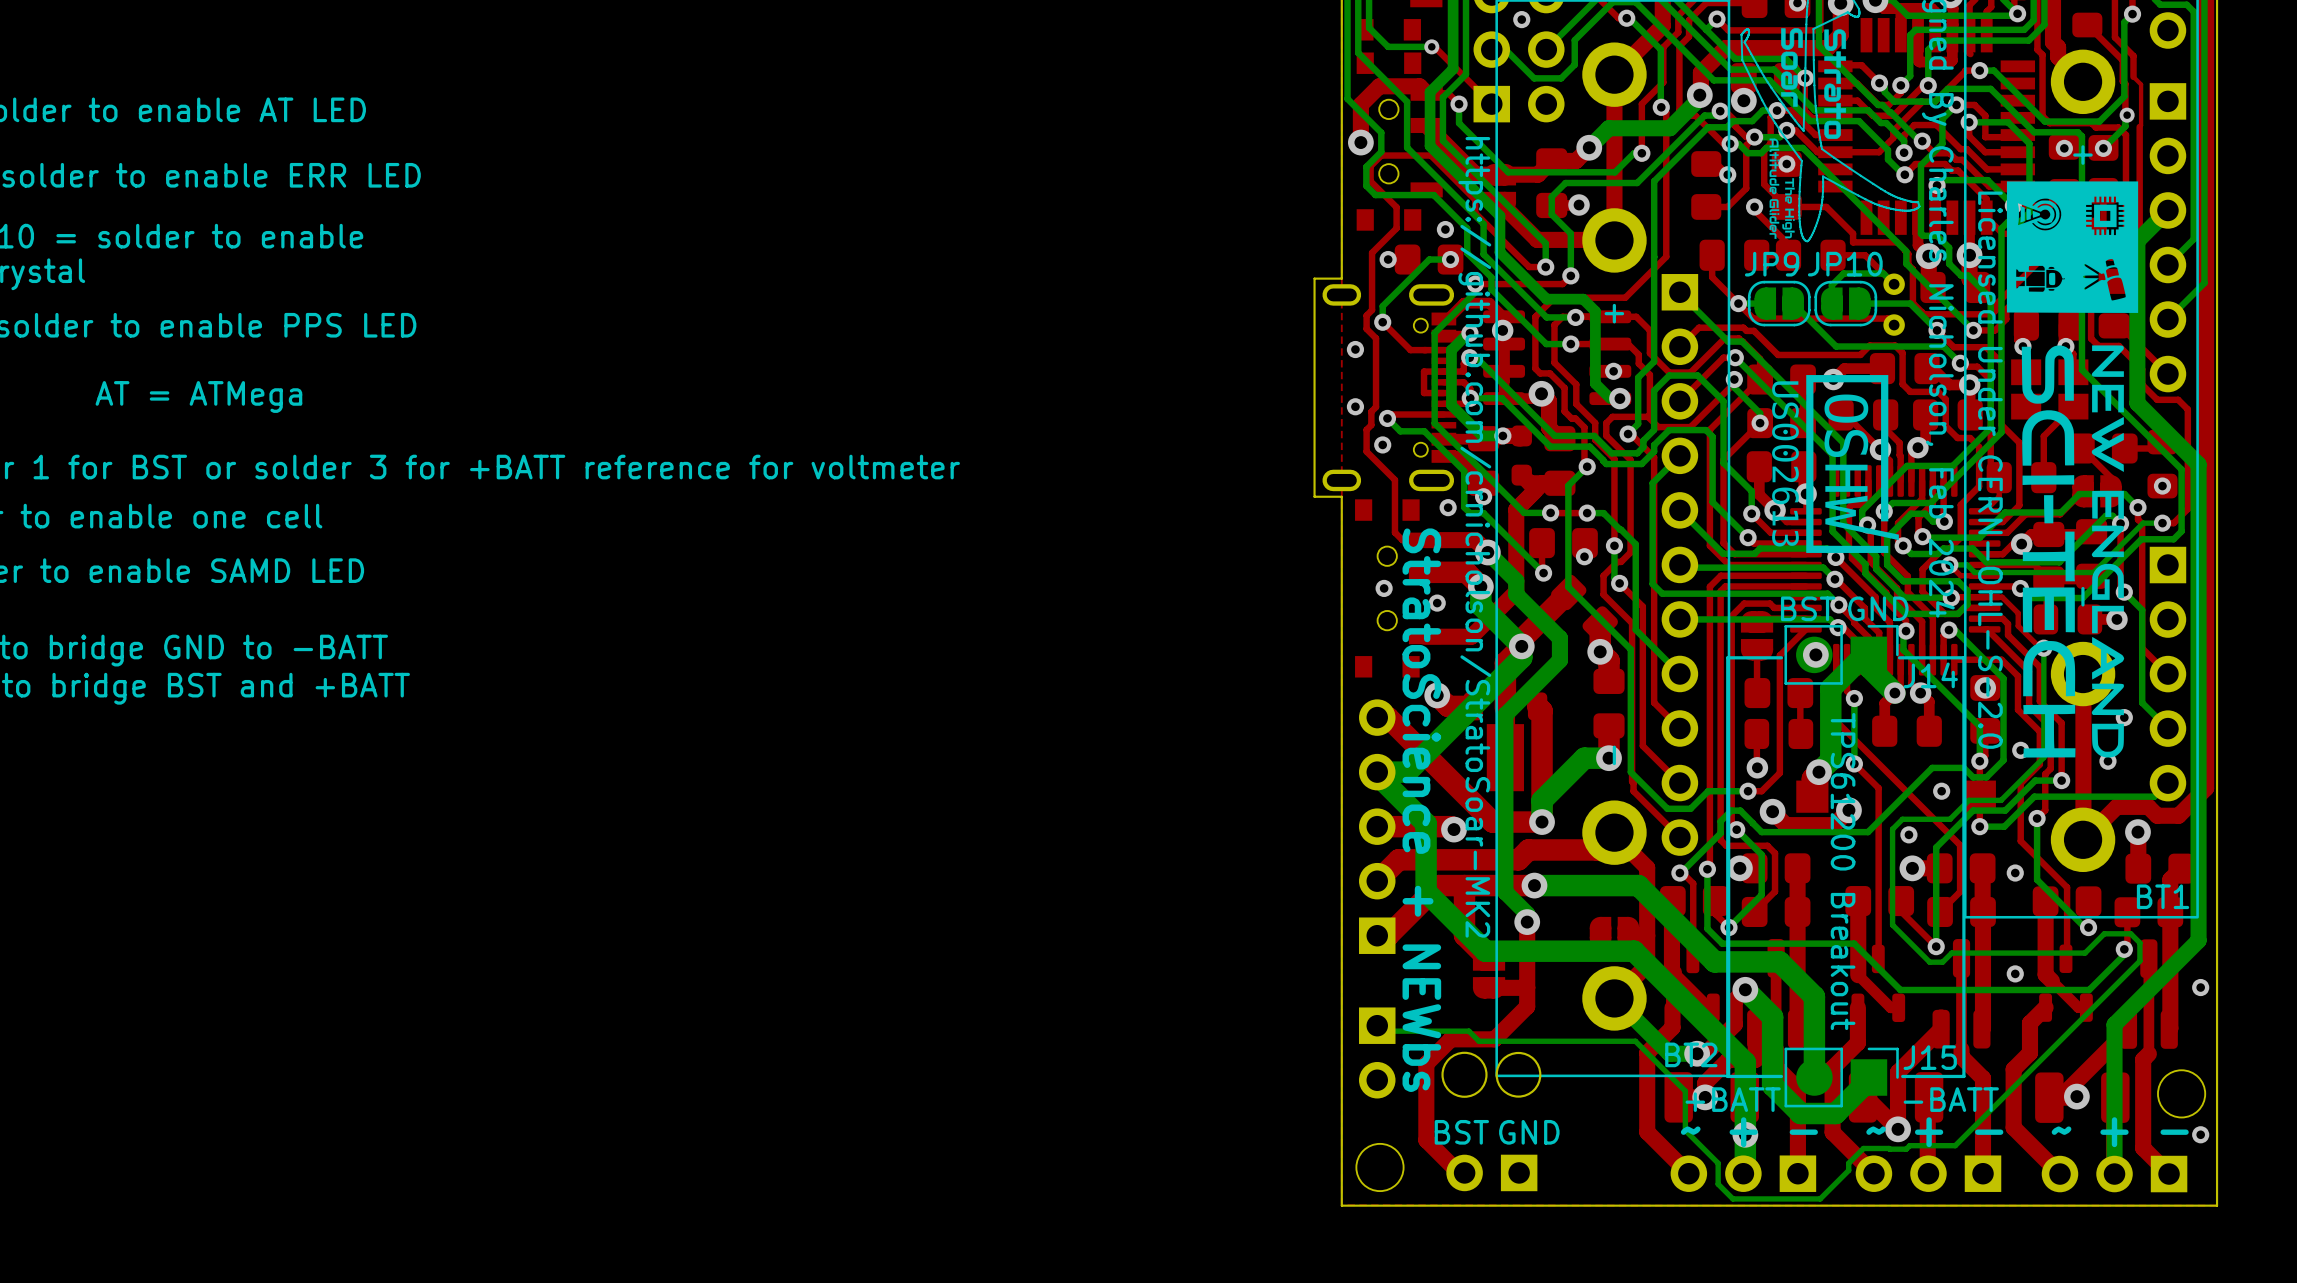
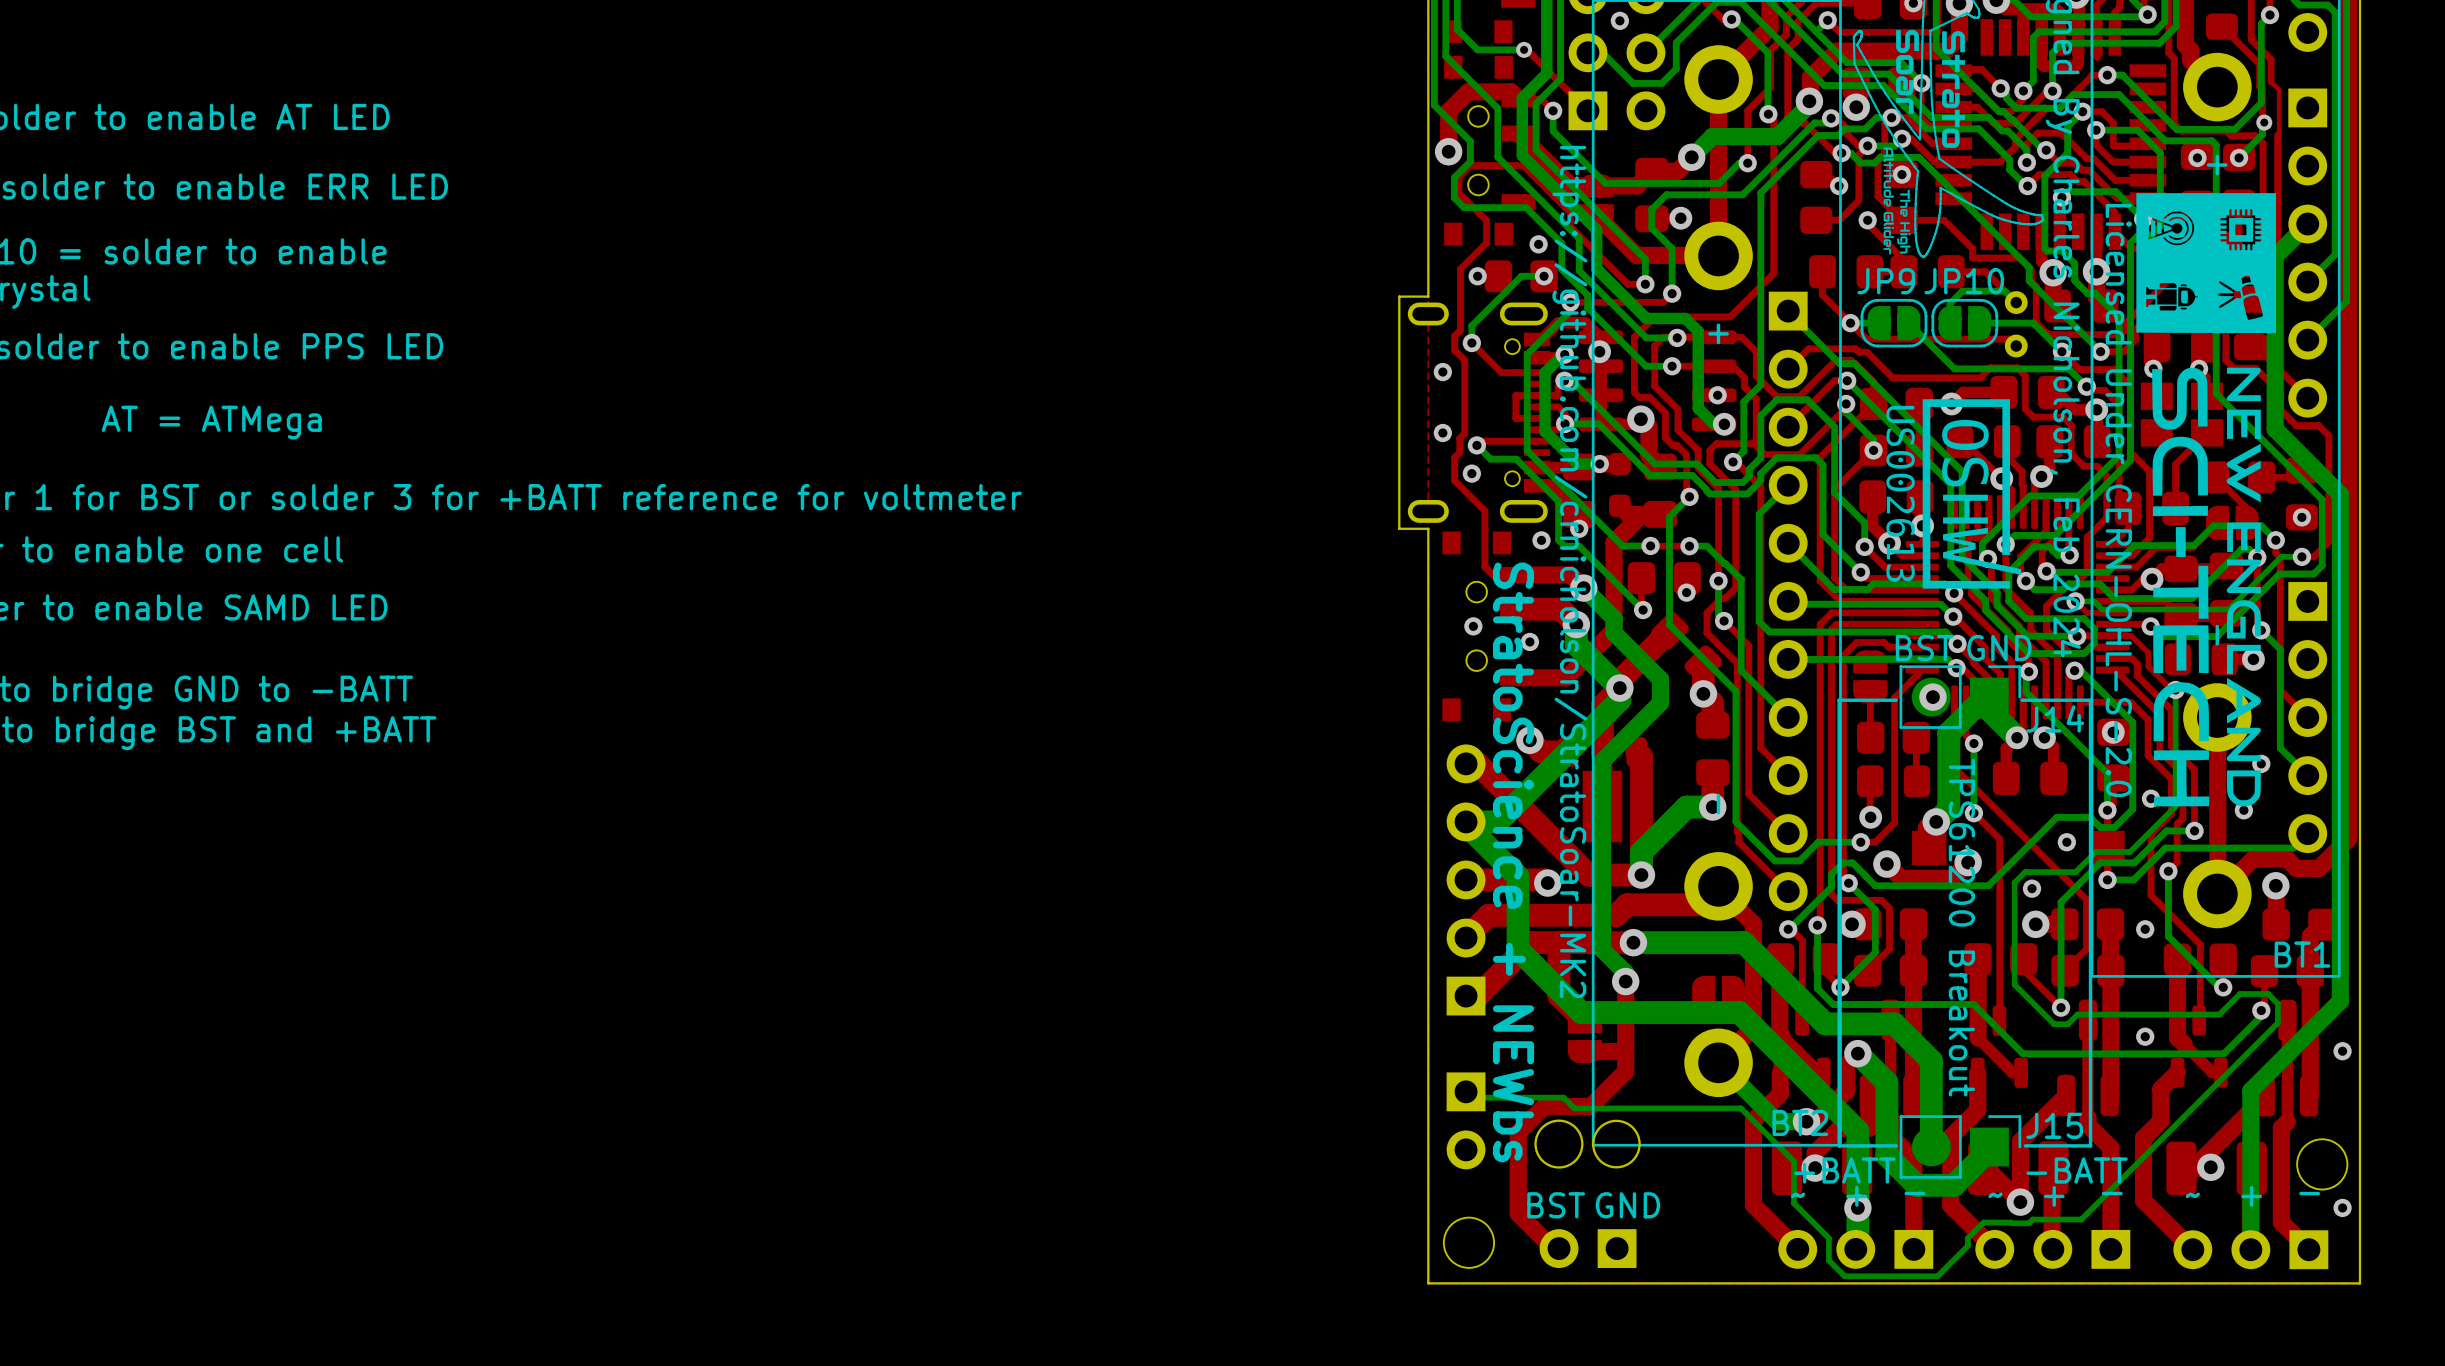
text: none -> - (1914, 1193)
text: none -> - (2112, 1193)
text: none -> - (2309, 1193)
text: none -> + (1856, 1196)
text: none -> + (2054, 1196)
text: none -> + (2251, 1196)
text: ~ + - (1749, 1132) -> ~ (1798, 1195)
text: ~ + - (1934, 1132) -> ~ (1995, 1195)
text: ~ + - (2120, 1132) -> ~ (2192, 1195)

